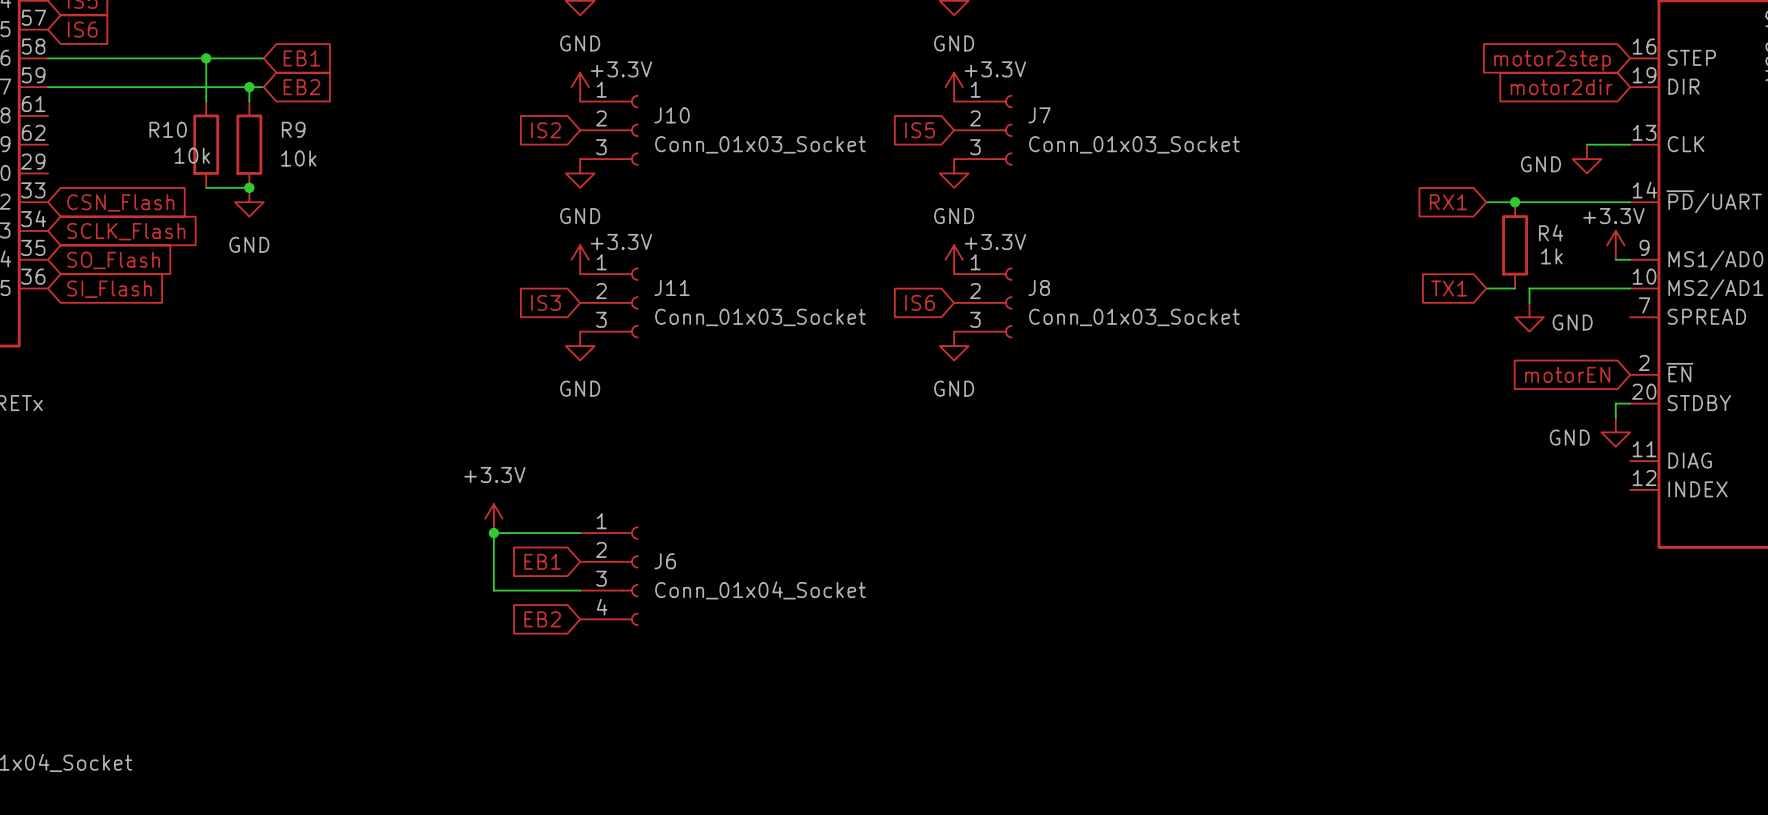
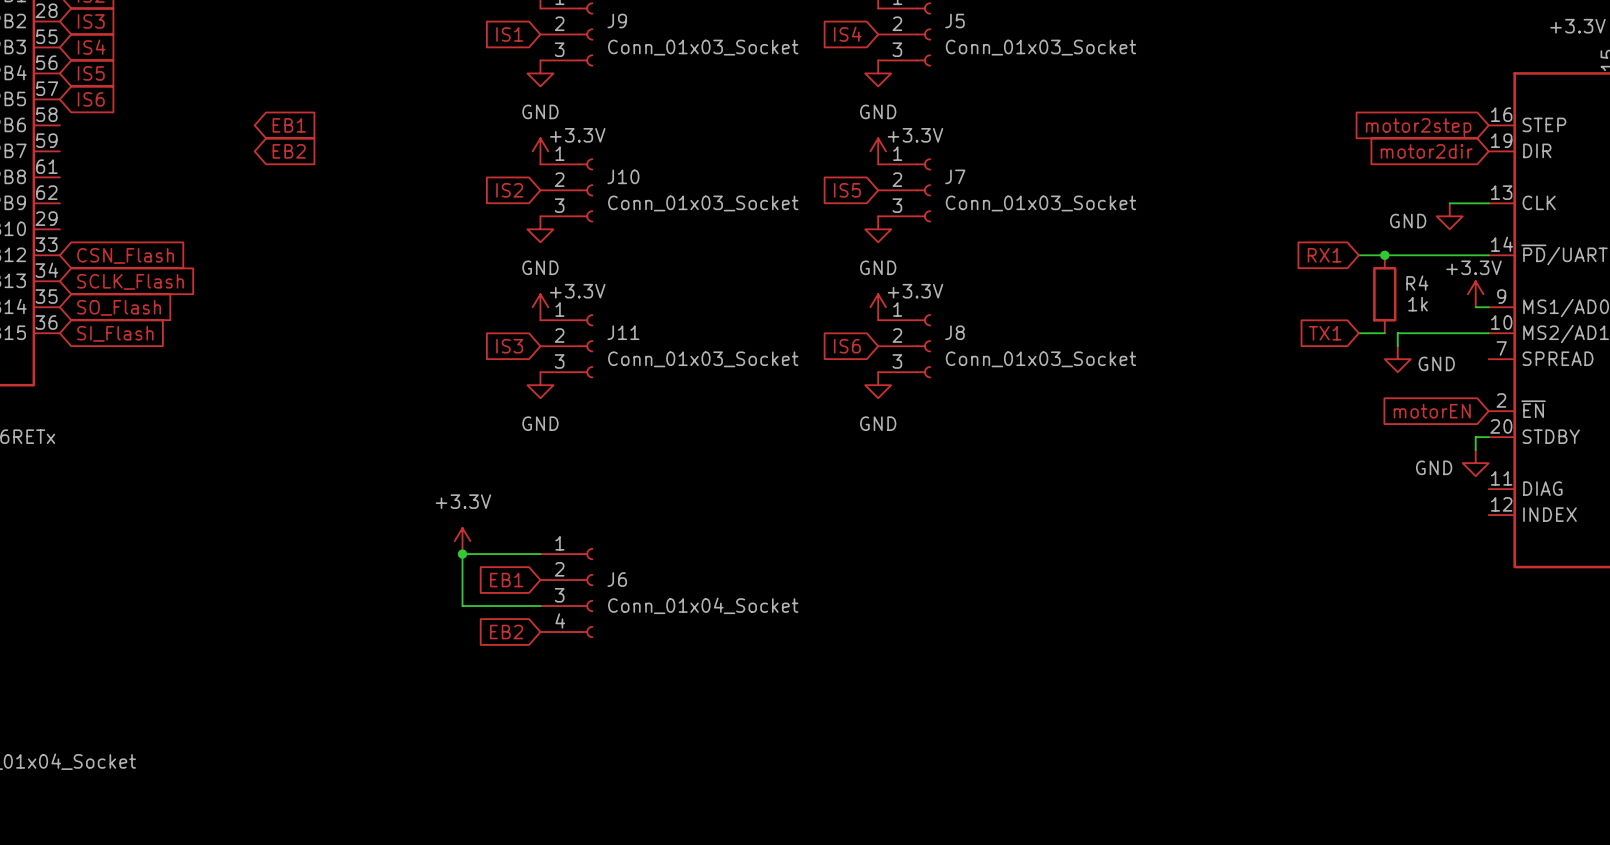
wire: (48, 58) (263, 58) -> none
wire: (206, 58) (206, 101) -> none
junction: (206, 58) -> none
wire: (48, 87) (263, 87) -> none
wire: (249, 87) (249, 101) -> none
junction: (249, 87) -> none
R10: 10k (206, 144) -> none
R9: 10k (249, 144) -> none
wire: (206, 187) (249, 187) -> none
junction: (249, 187) -> none
power symbol: GND (249, 202) -> none

